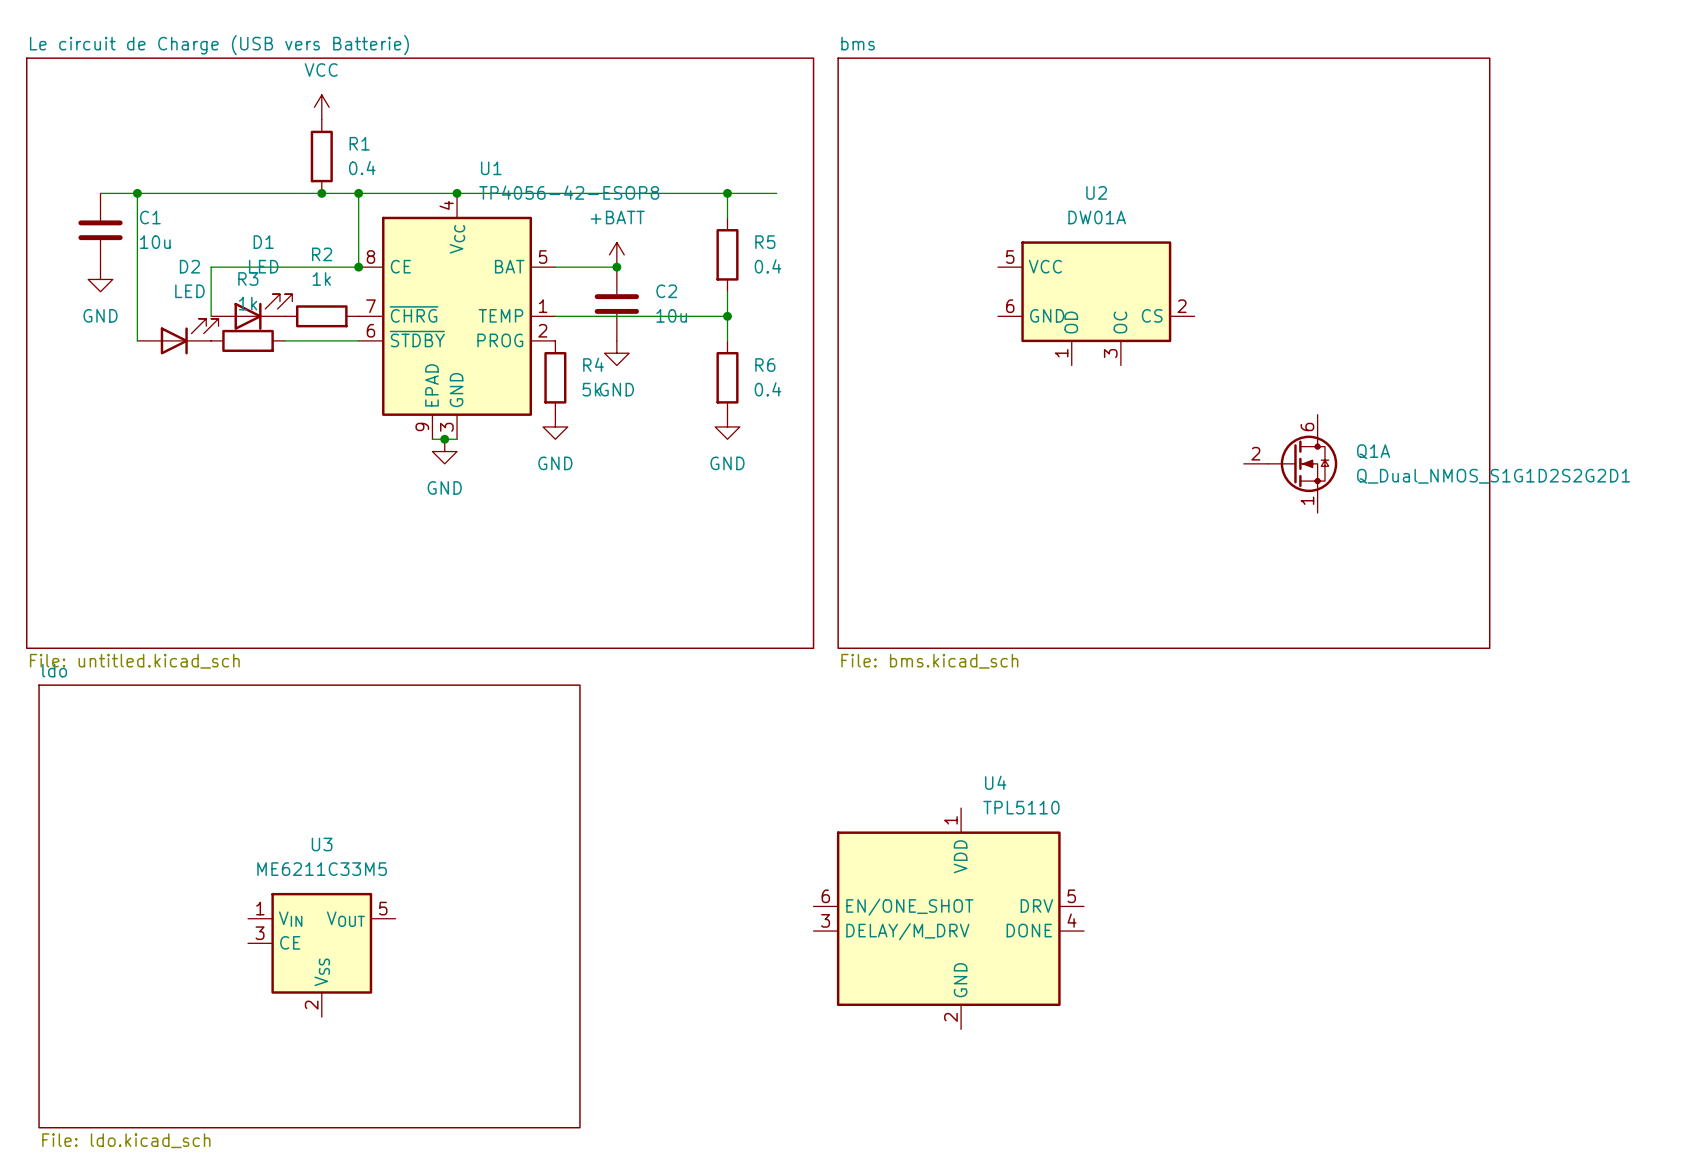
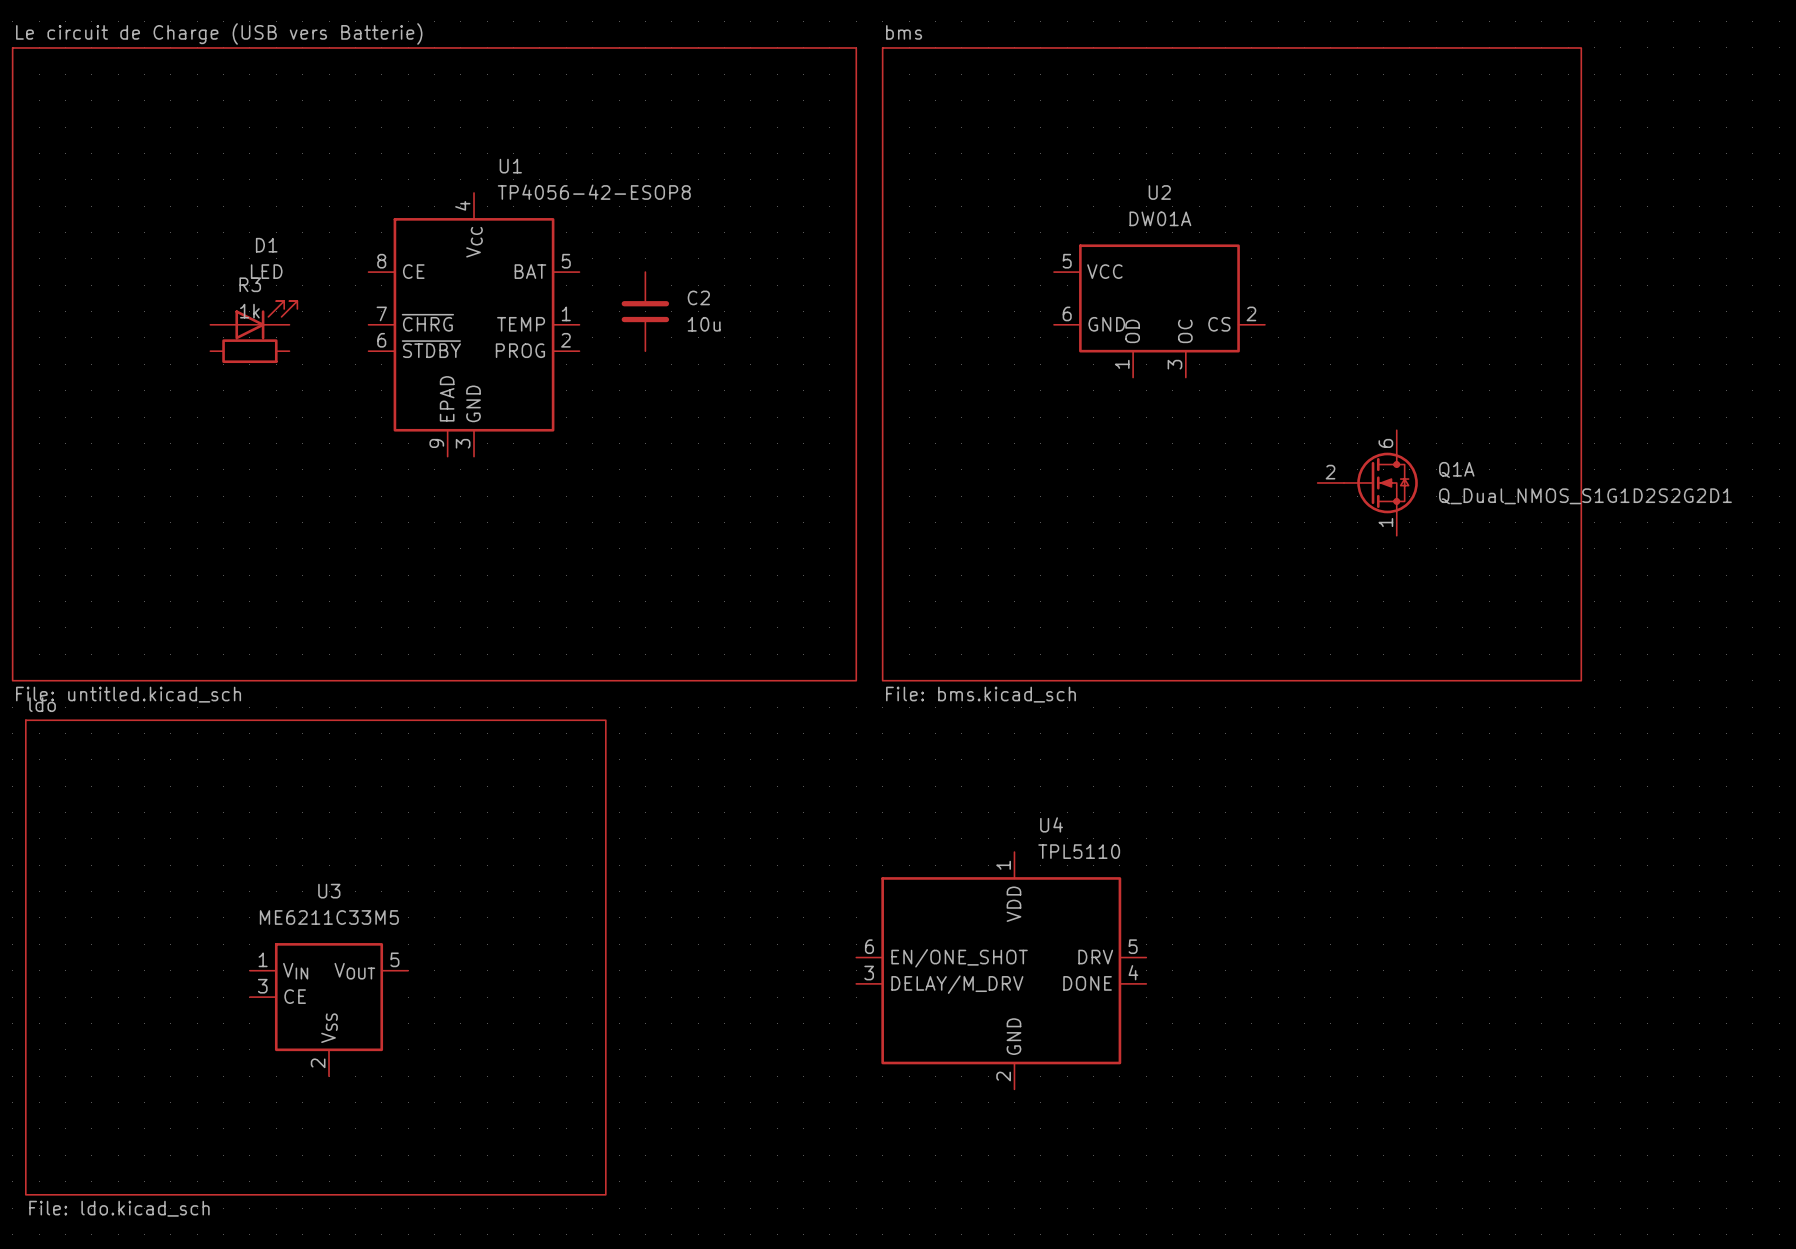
power symbol: VCC (321, 107) -> none
R1: 0.4 (321, 156) -> none
wire: (100, 193) (776, 193) -> none
wire: (137, 193) (137, 340) -> none
junction: (137, 193) -> none
junction: (321, 193) -> none
wire: (358, 193) (358, 267) (211, 267) (211, 316) -> none
junction: (358, 193) -> none
junction: (457, 193) -> none
wire: (727, 193) (727, 217) -> none
junction: (727, 193) -> none
C1: 10u (100, 230) -> none
power symbol: +BATT (616, 254) -> none
R5: 0.4 (727, 254) -> none
junction: (358, 267) -> none
wire: (555, 267) (616, 267) -> none
junction: (616, 267) -> none
power symbol: GND (100, 279) -> none
wire: (727, 291) (727, 340) -> none
R2: 1k (321, 316) -> none
wire: (555, 316) (727, 316) -> none
junction: (727, 316) -> none
D2: LED (177, 336) -> none
wire: (284, 340) (358, 340) -> none
power symbol: GND (616, 353) -> none
R4: 5k (555, 377) -> none
R6: 0.4 (727, 377) -> none
power symbol: GND (555, 426) -> none
power symbol: GND (727, 426) -> none
wire: (432, 439) (457, 439) -> none
junction: (444, 439) -> none
power symbol: GND (444, 451) -> none

